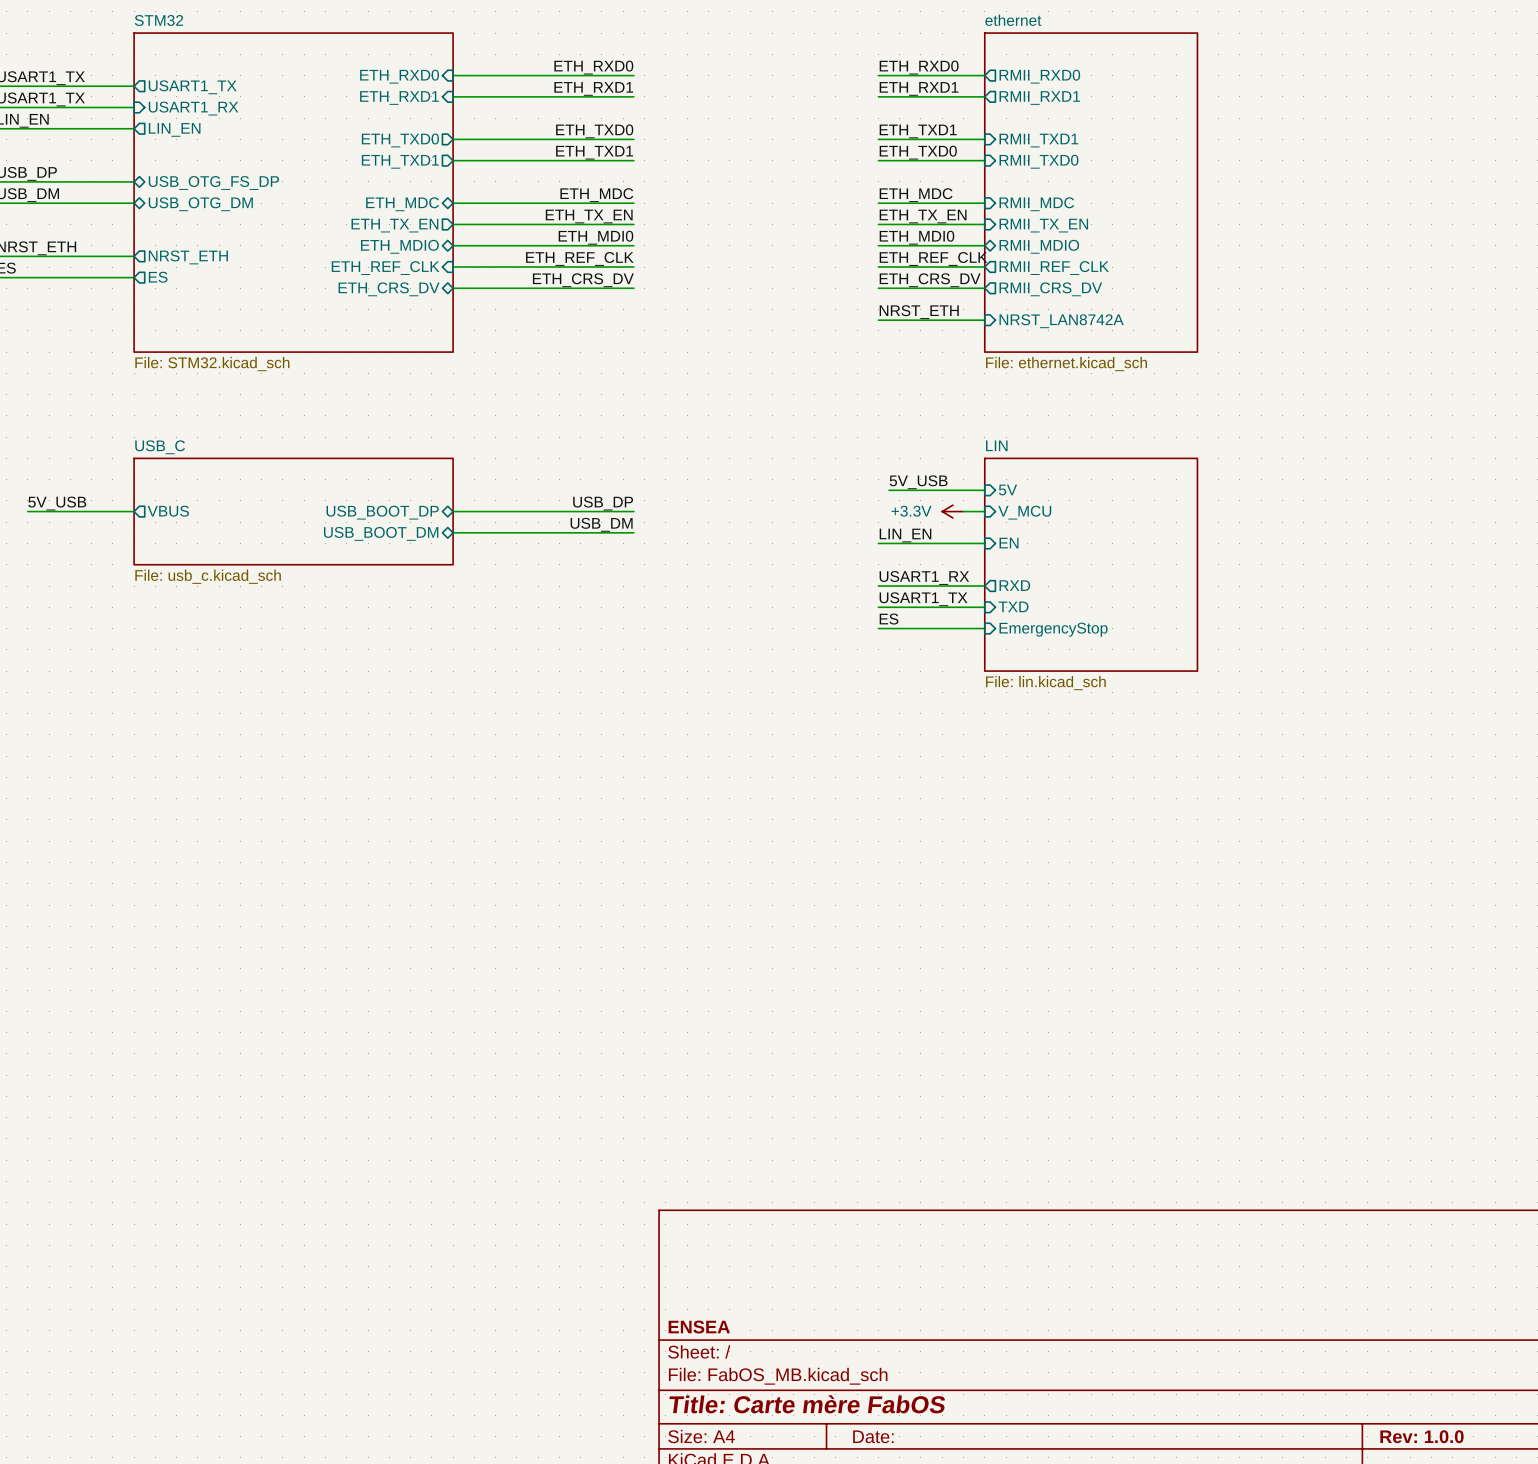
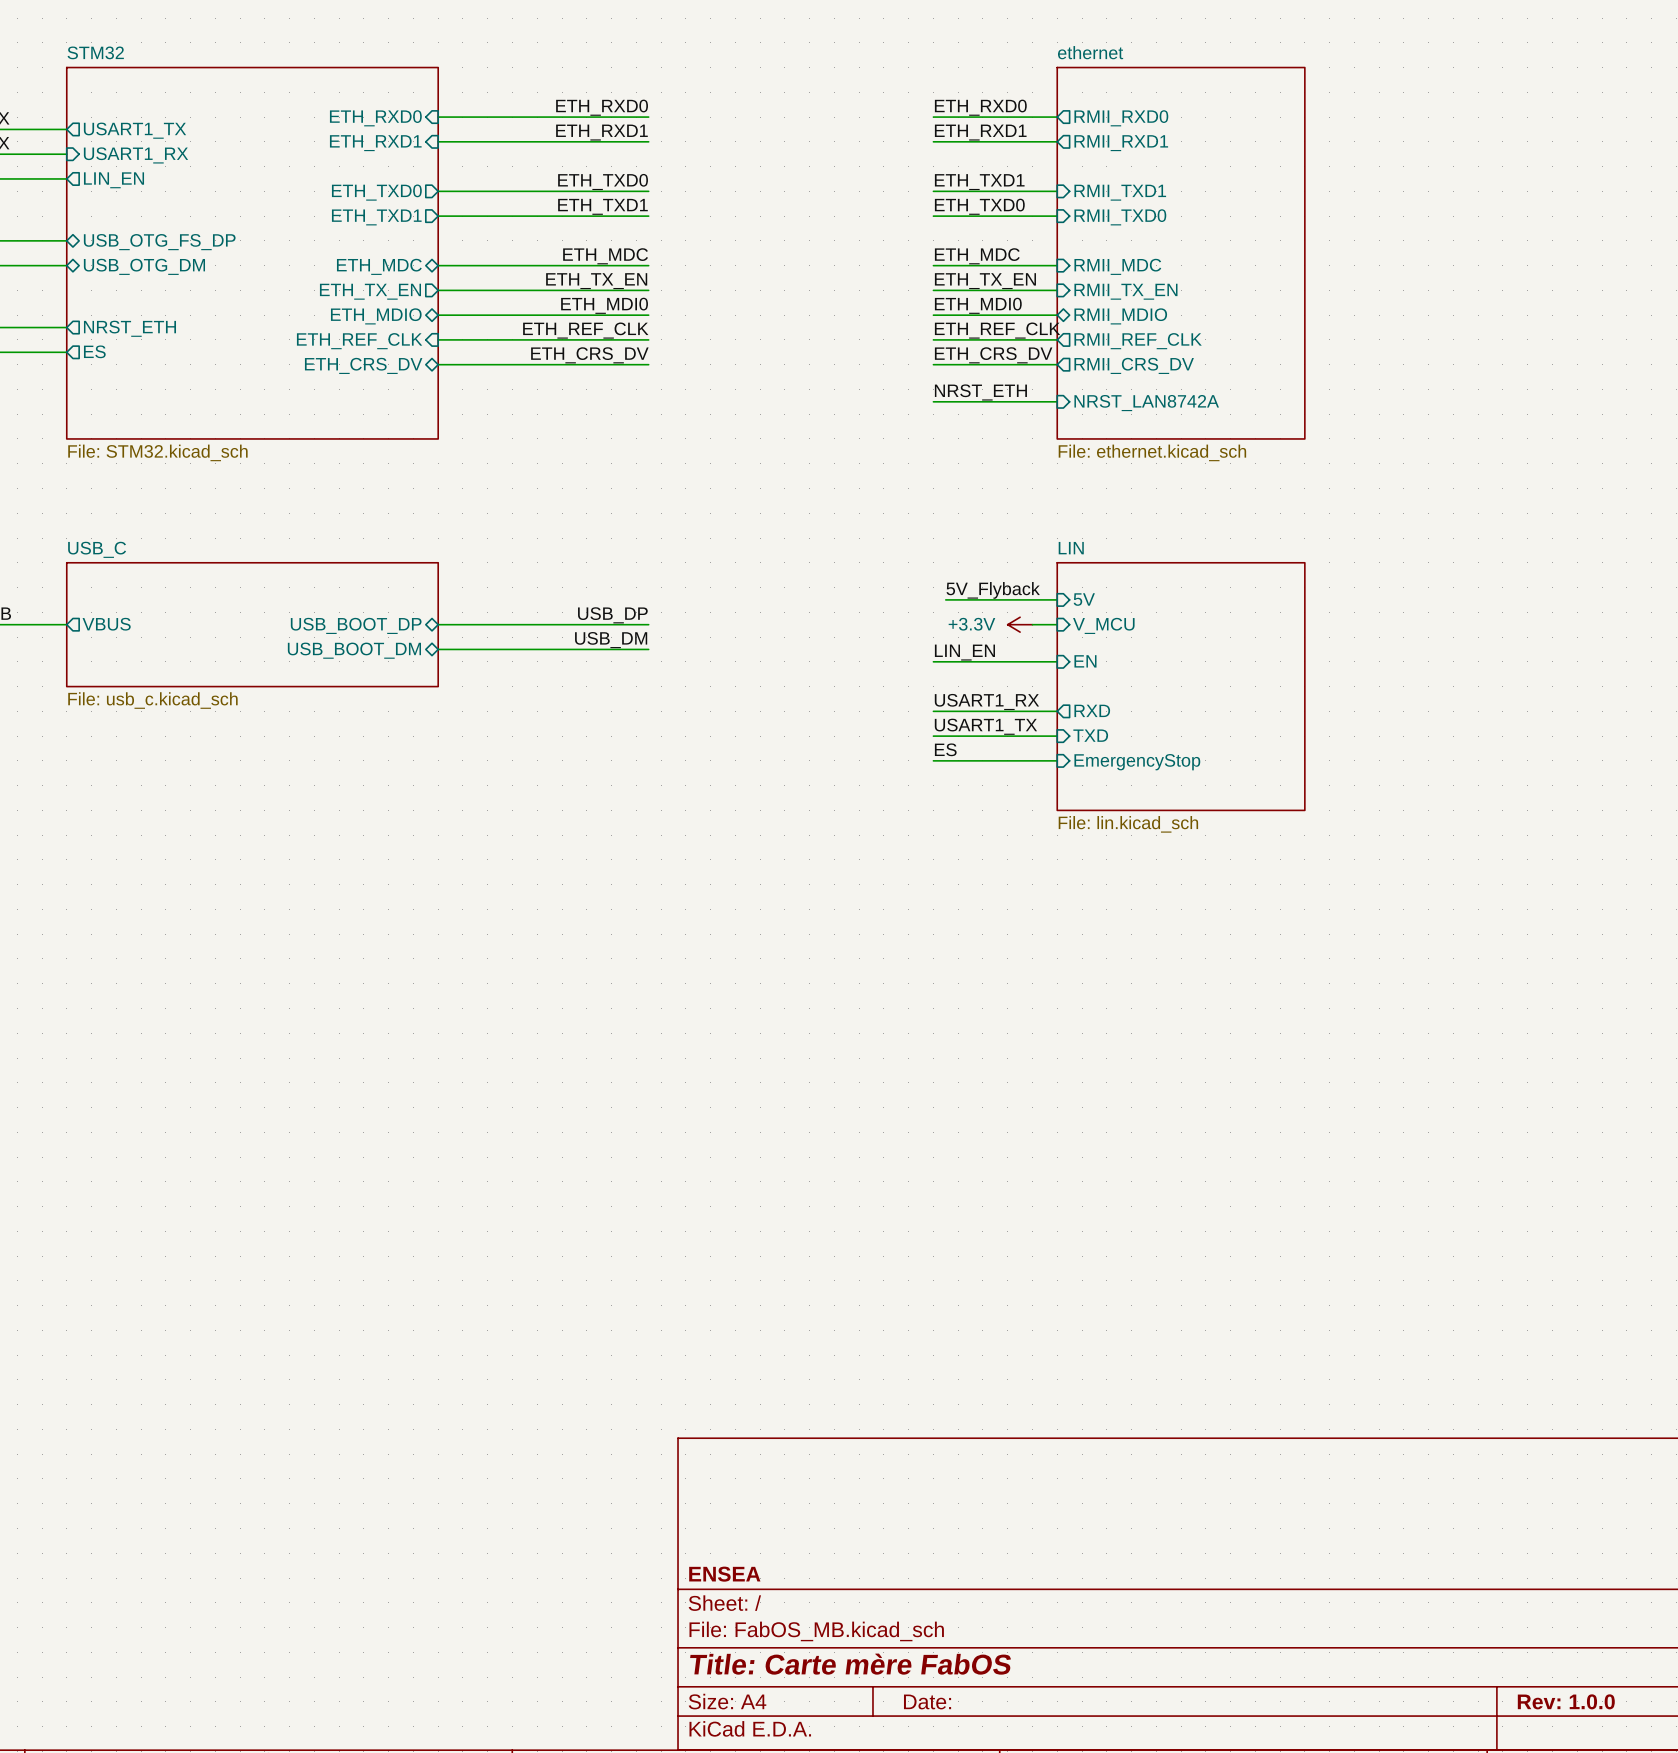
label: 5V_USB (918, 482) -> 5V_Flyback (993, 590)

